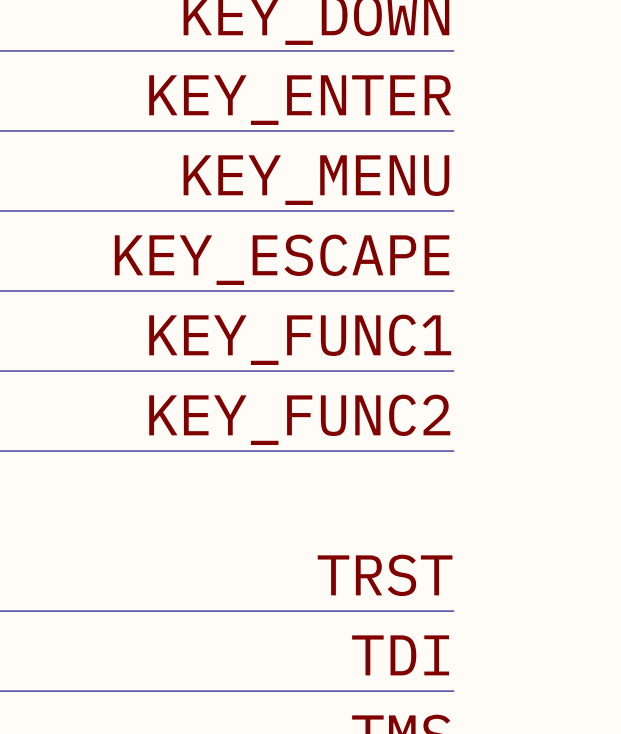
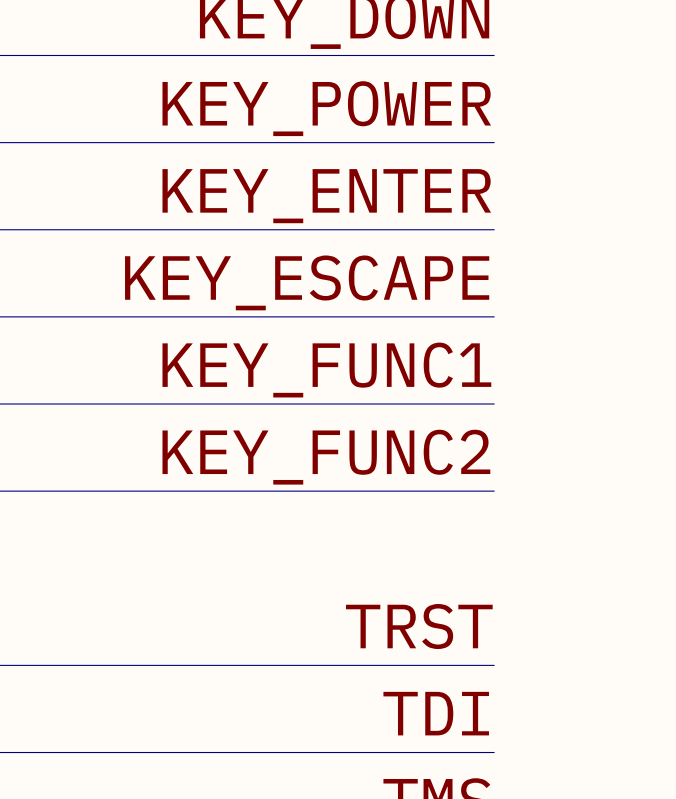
label: KEY_ENTER (300, 100) -> KEY_POWER (326, 108)
label: KEY_MENU (316, 180) -> KEY_ENTER (326, 196)

